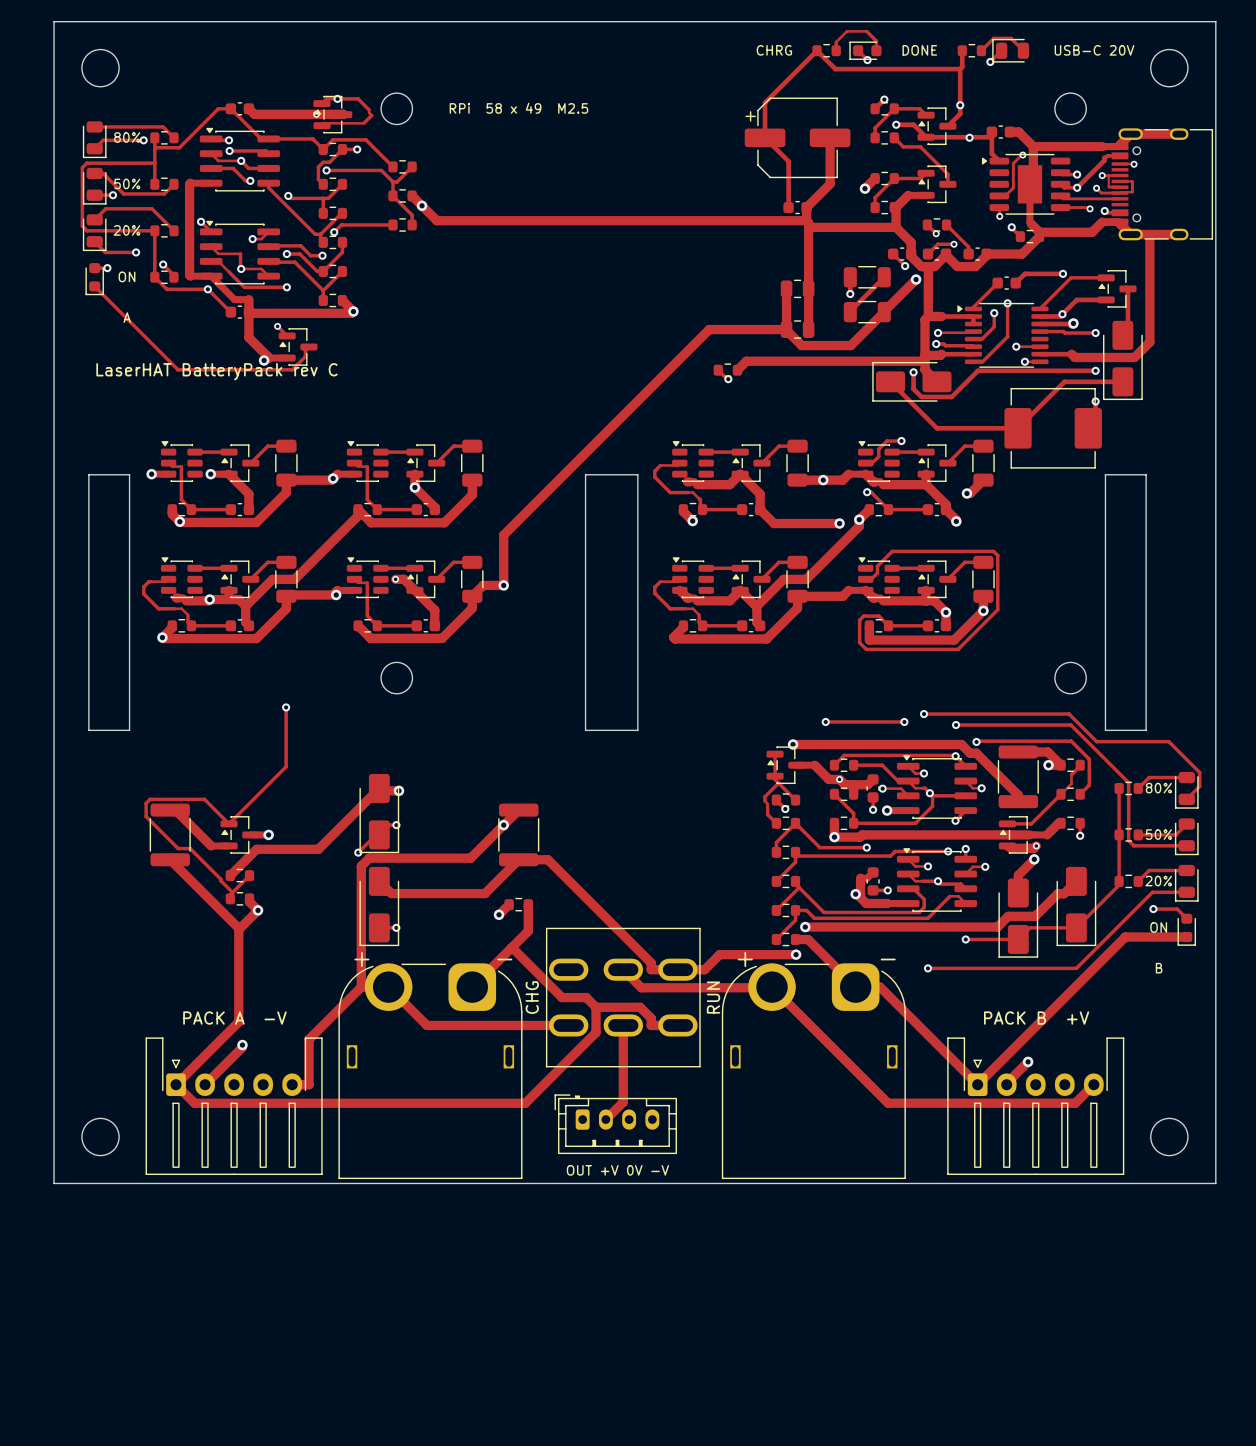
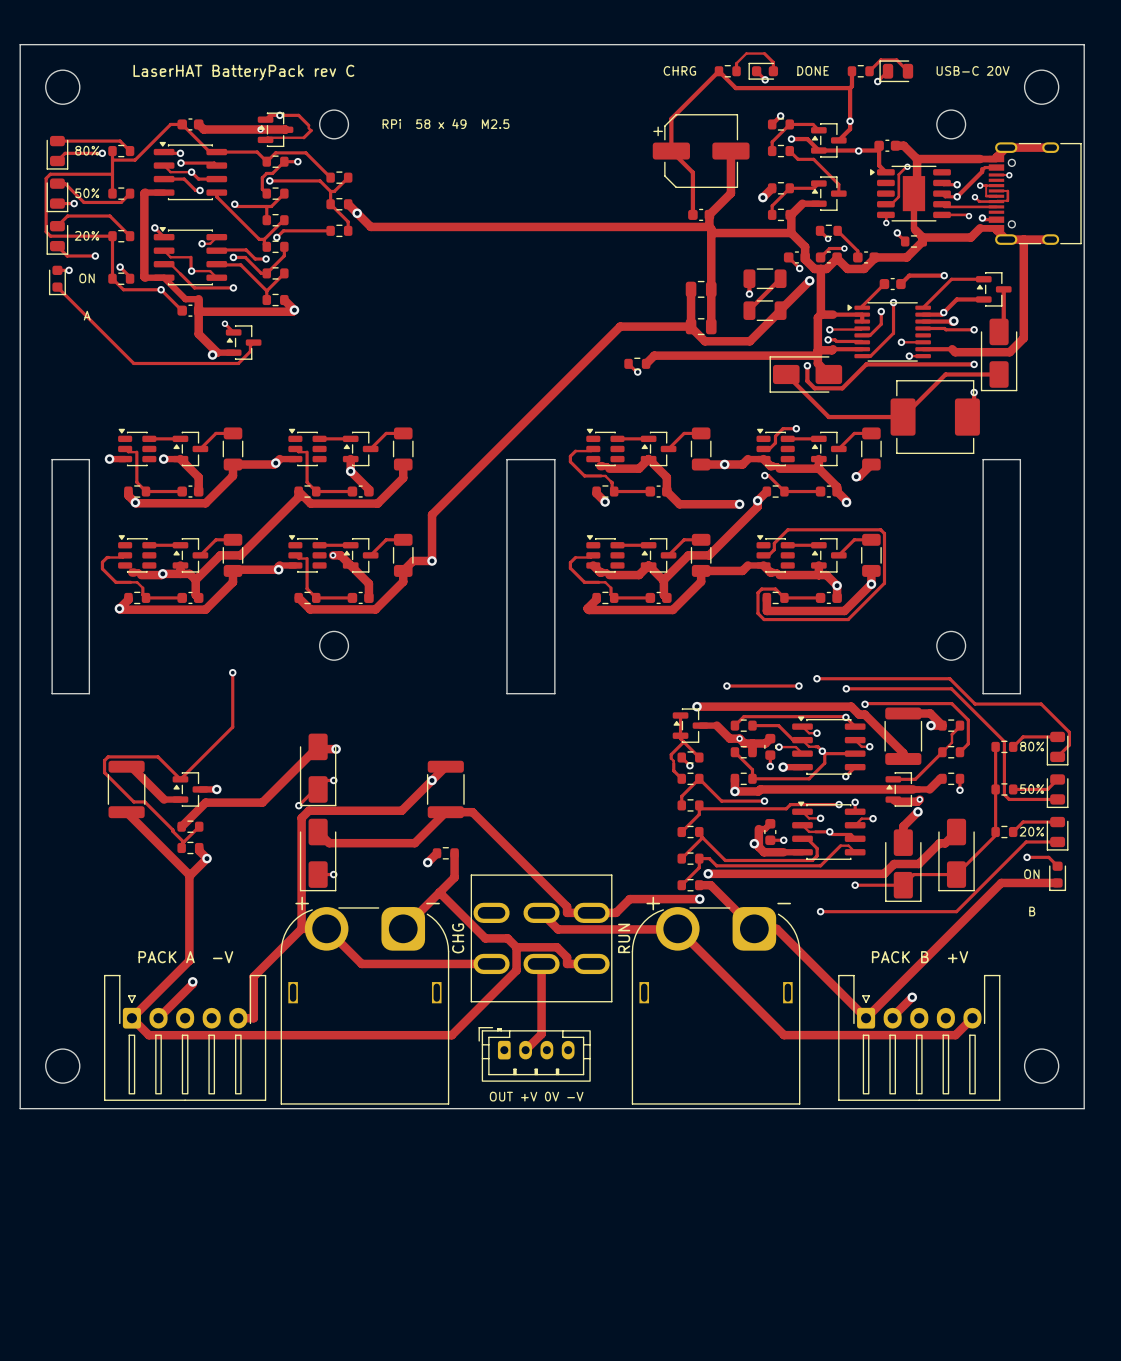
text: none -> LaserHAT BatteryPack rev C (243, 72)
text: LaserHAT BatteryPack rev C (216, 371) -> none

